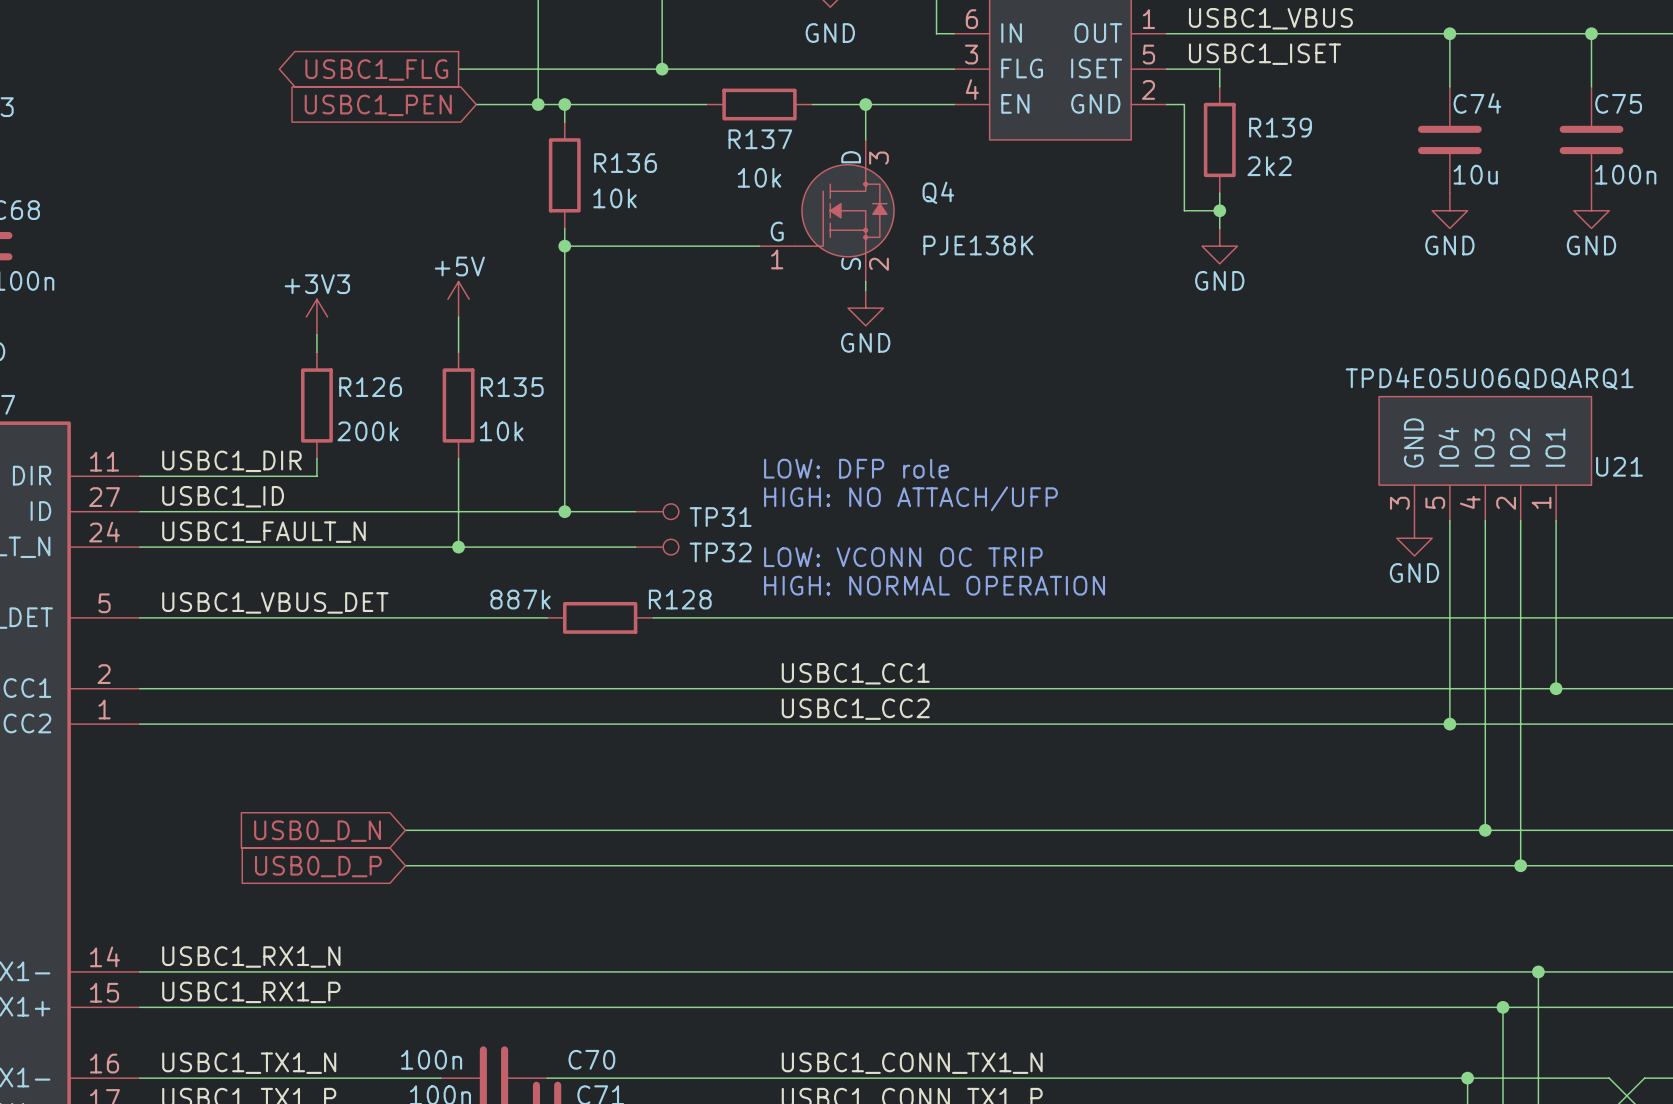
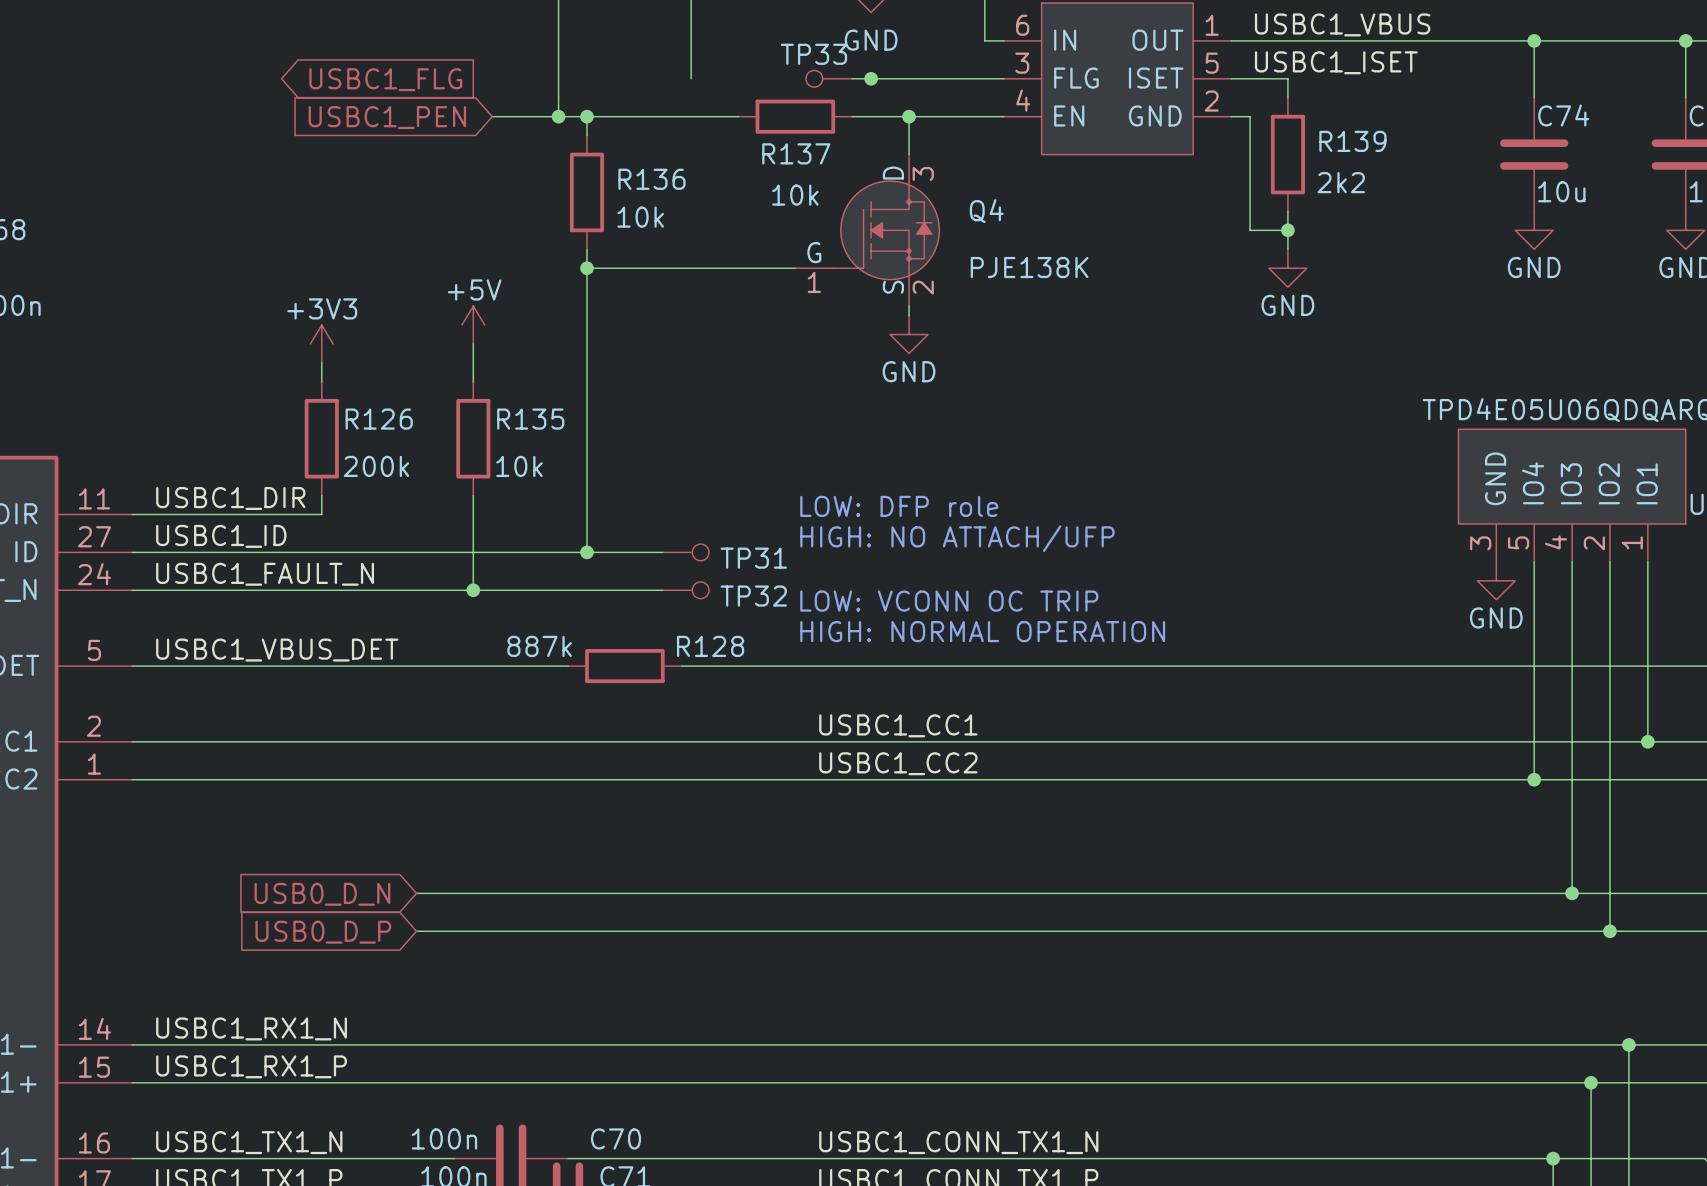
wire: (458, 69) (812, 69) -> none
junction: (662, 69) -> none
TP33: none -> (829, 78)
junction: none -> (871, 78)

